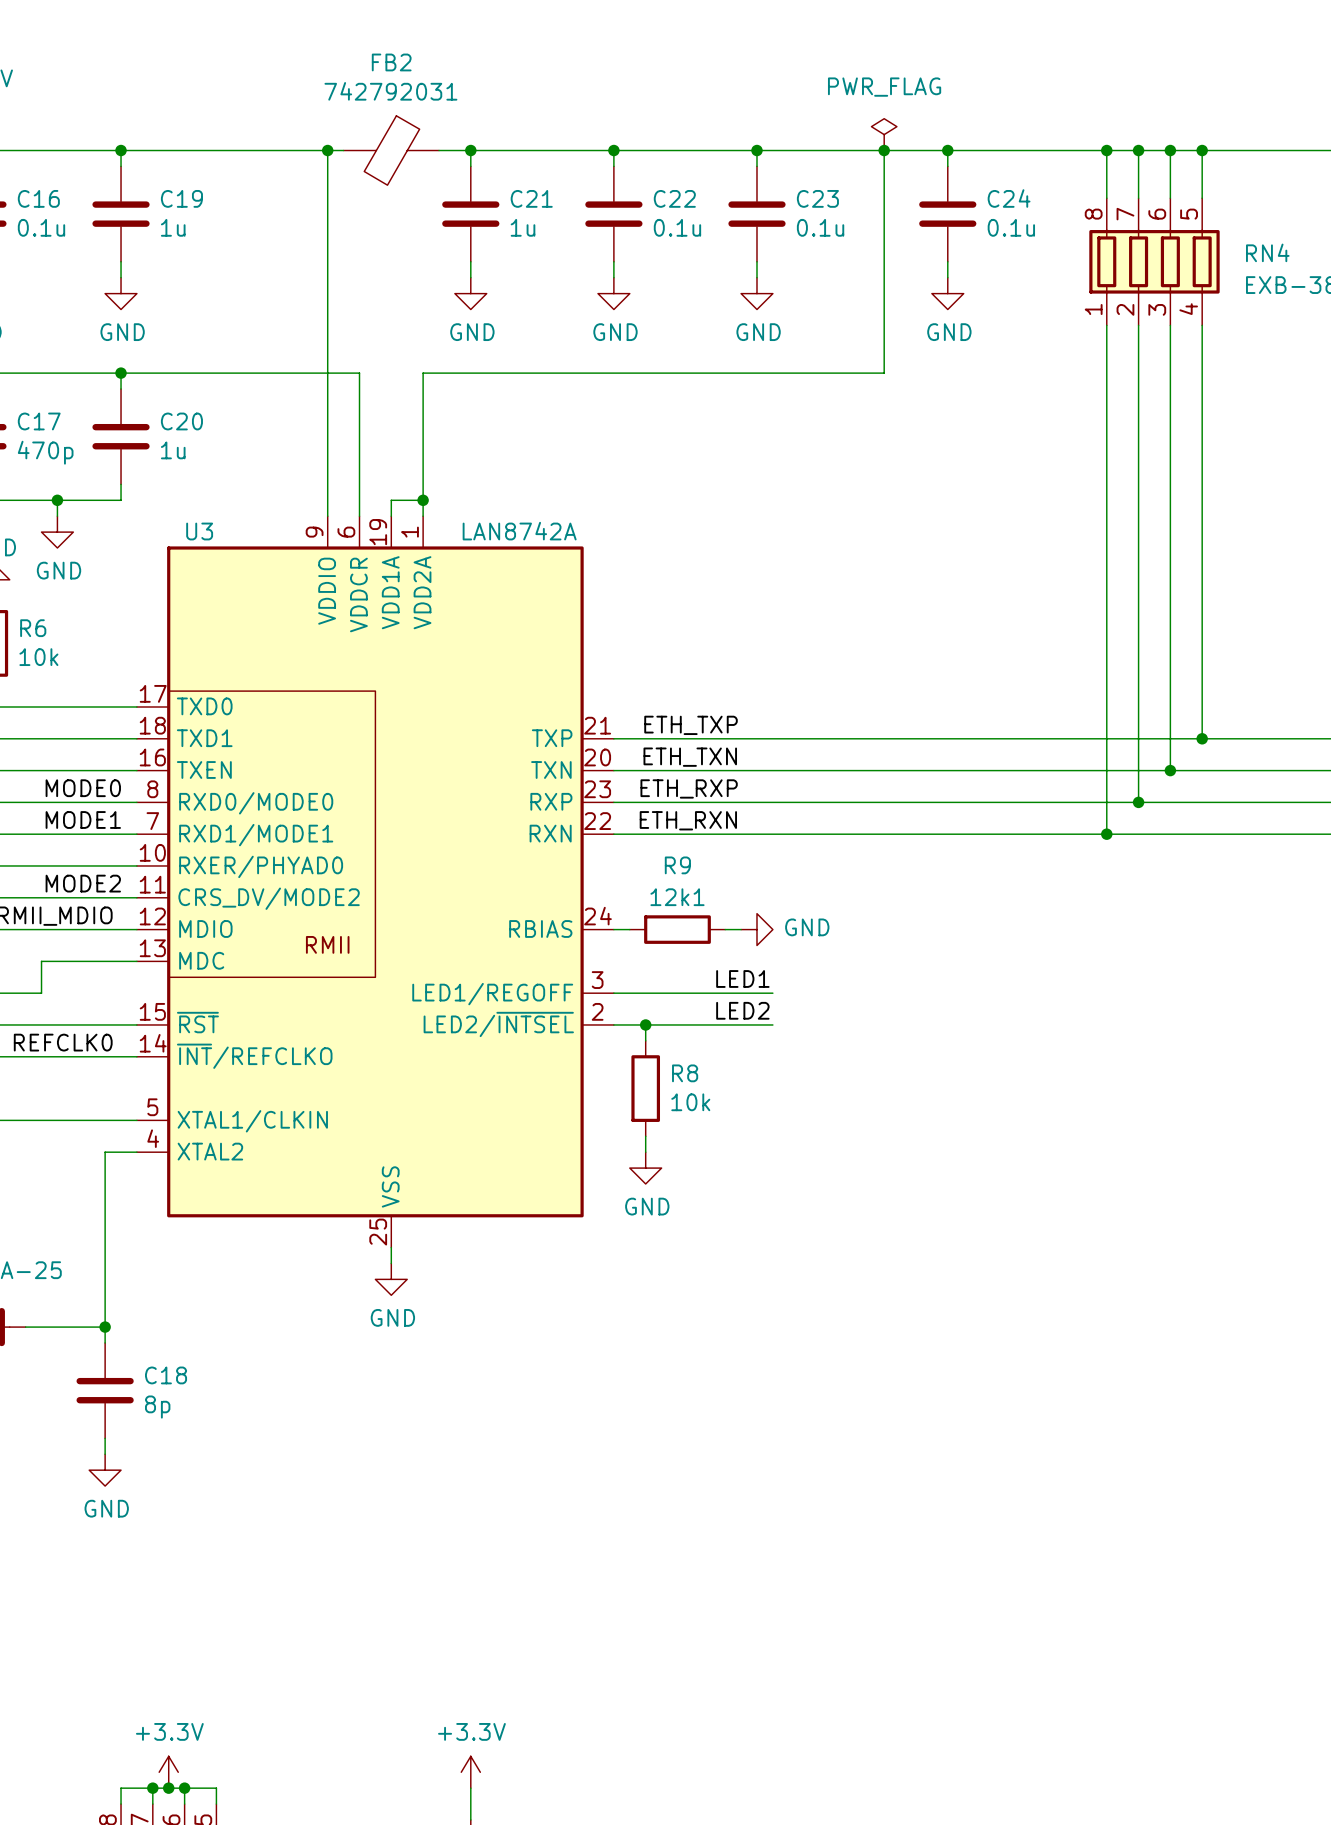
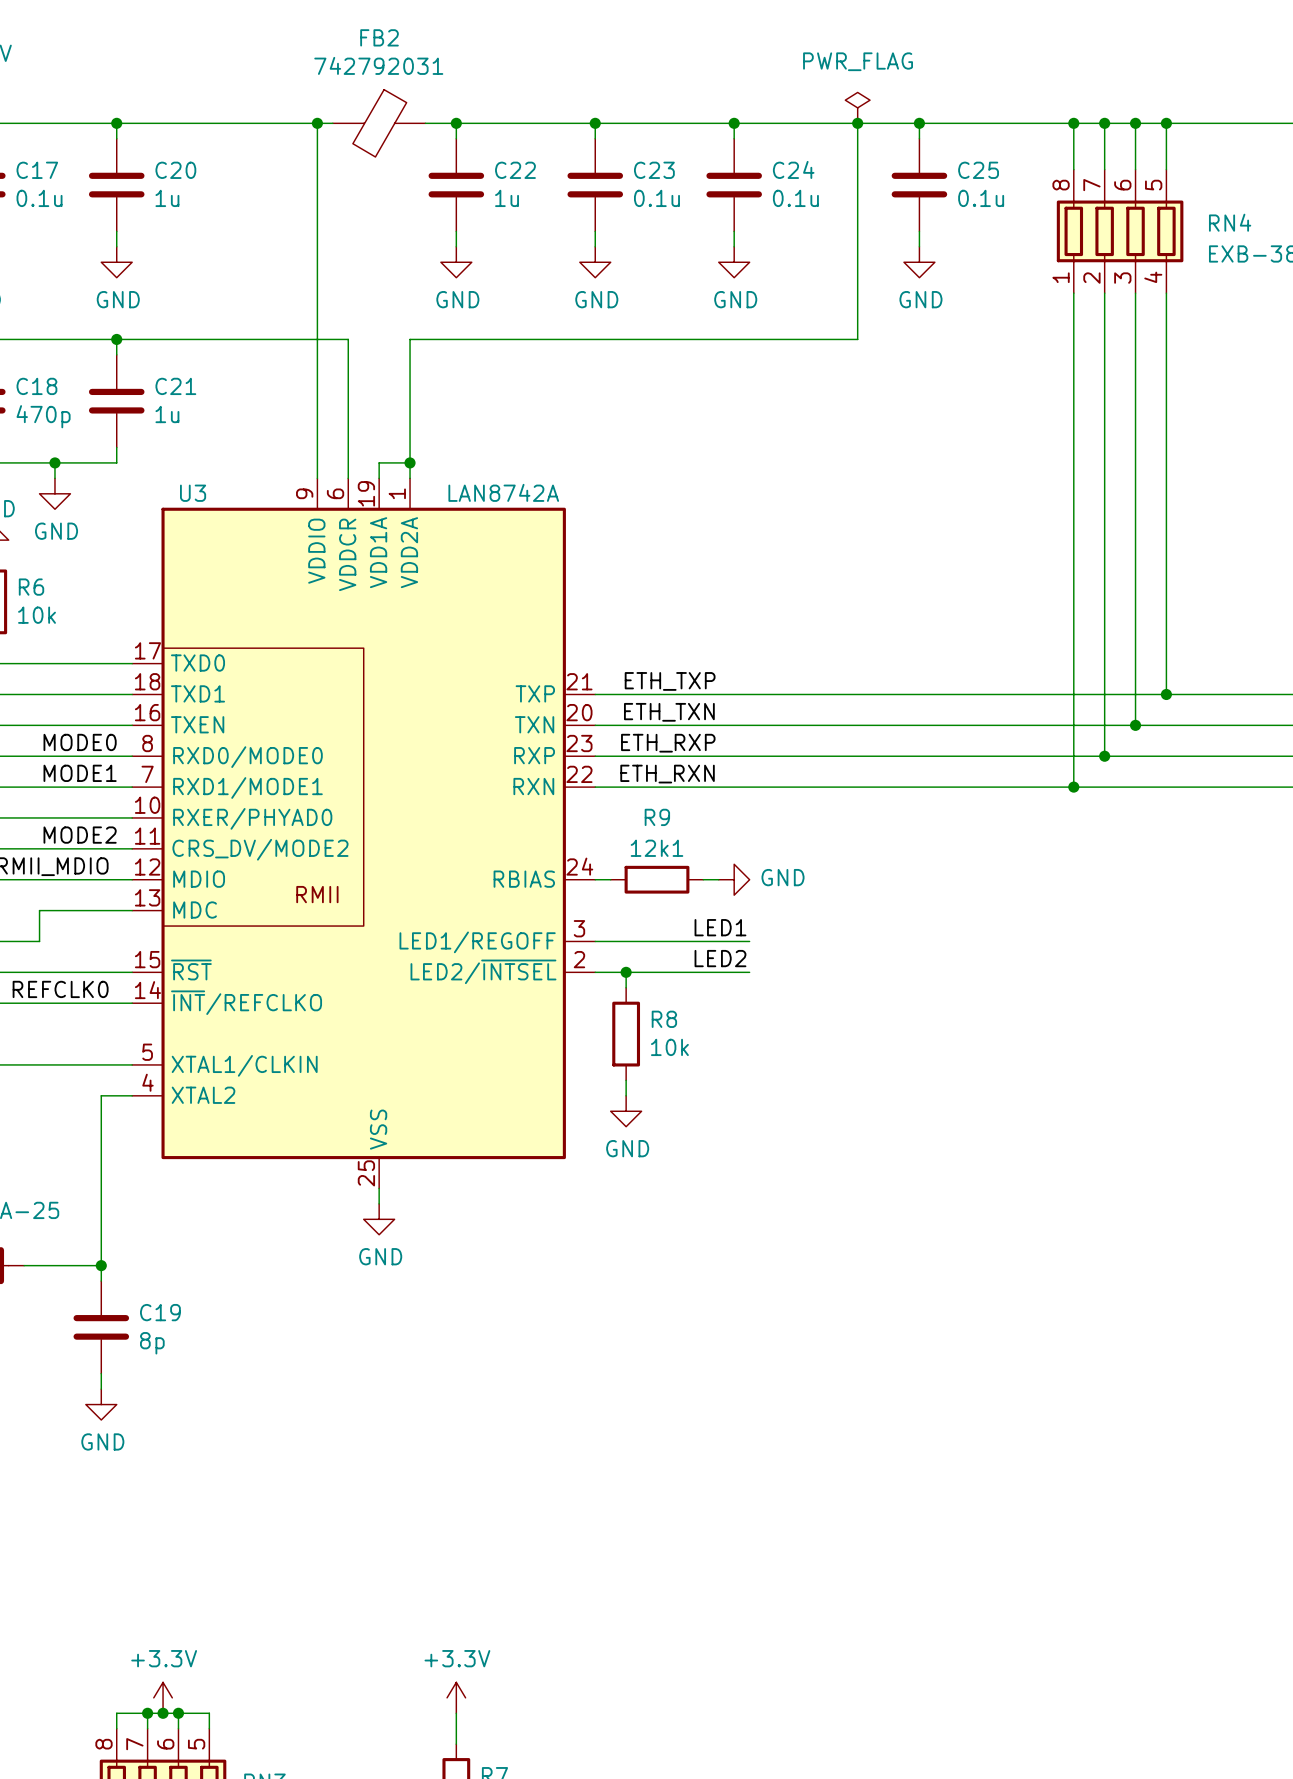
C16 name: C16 (38, 198) -> C17 (37, 170)
C19 name: C19 (181, 198) -> C20 (175, 170)
C21 name: C21 (531, 198) -> C22 (515, 170)
C22 name: C22 (674, 198) -> C23 (654, 170)
C23 name: C23 (817, 198) -> C24 (793, 169)
C24 name: C24 (1009, 198) -> C25 (978, 170)
C17 name: C17 (39, 421) -> C18 (36, 386)
C20 name: C20 (181, 421) -> C21 (175, 386)
C18 name: C18 (166, 1375) -> C19 (160, 1312)

